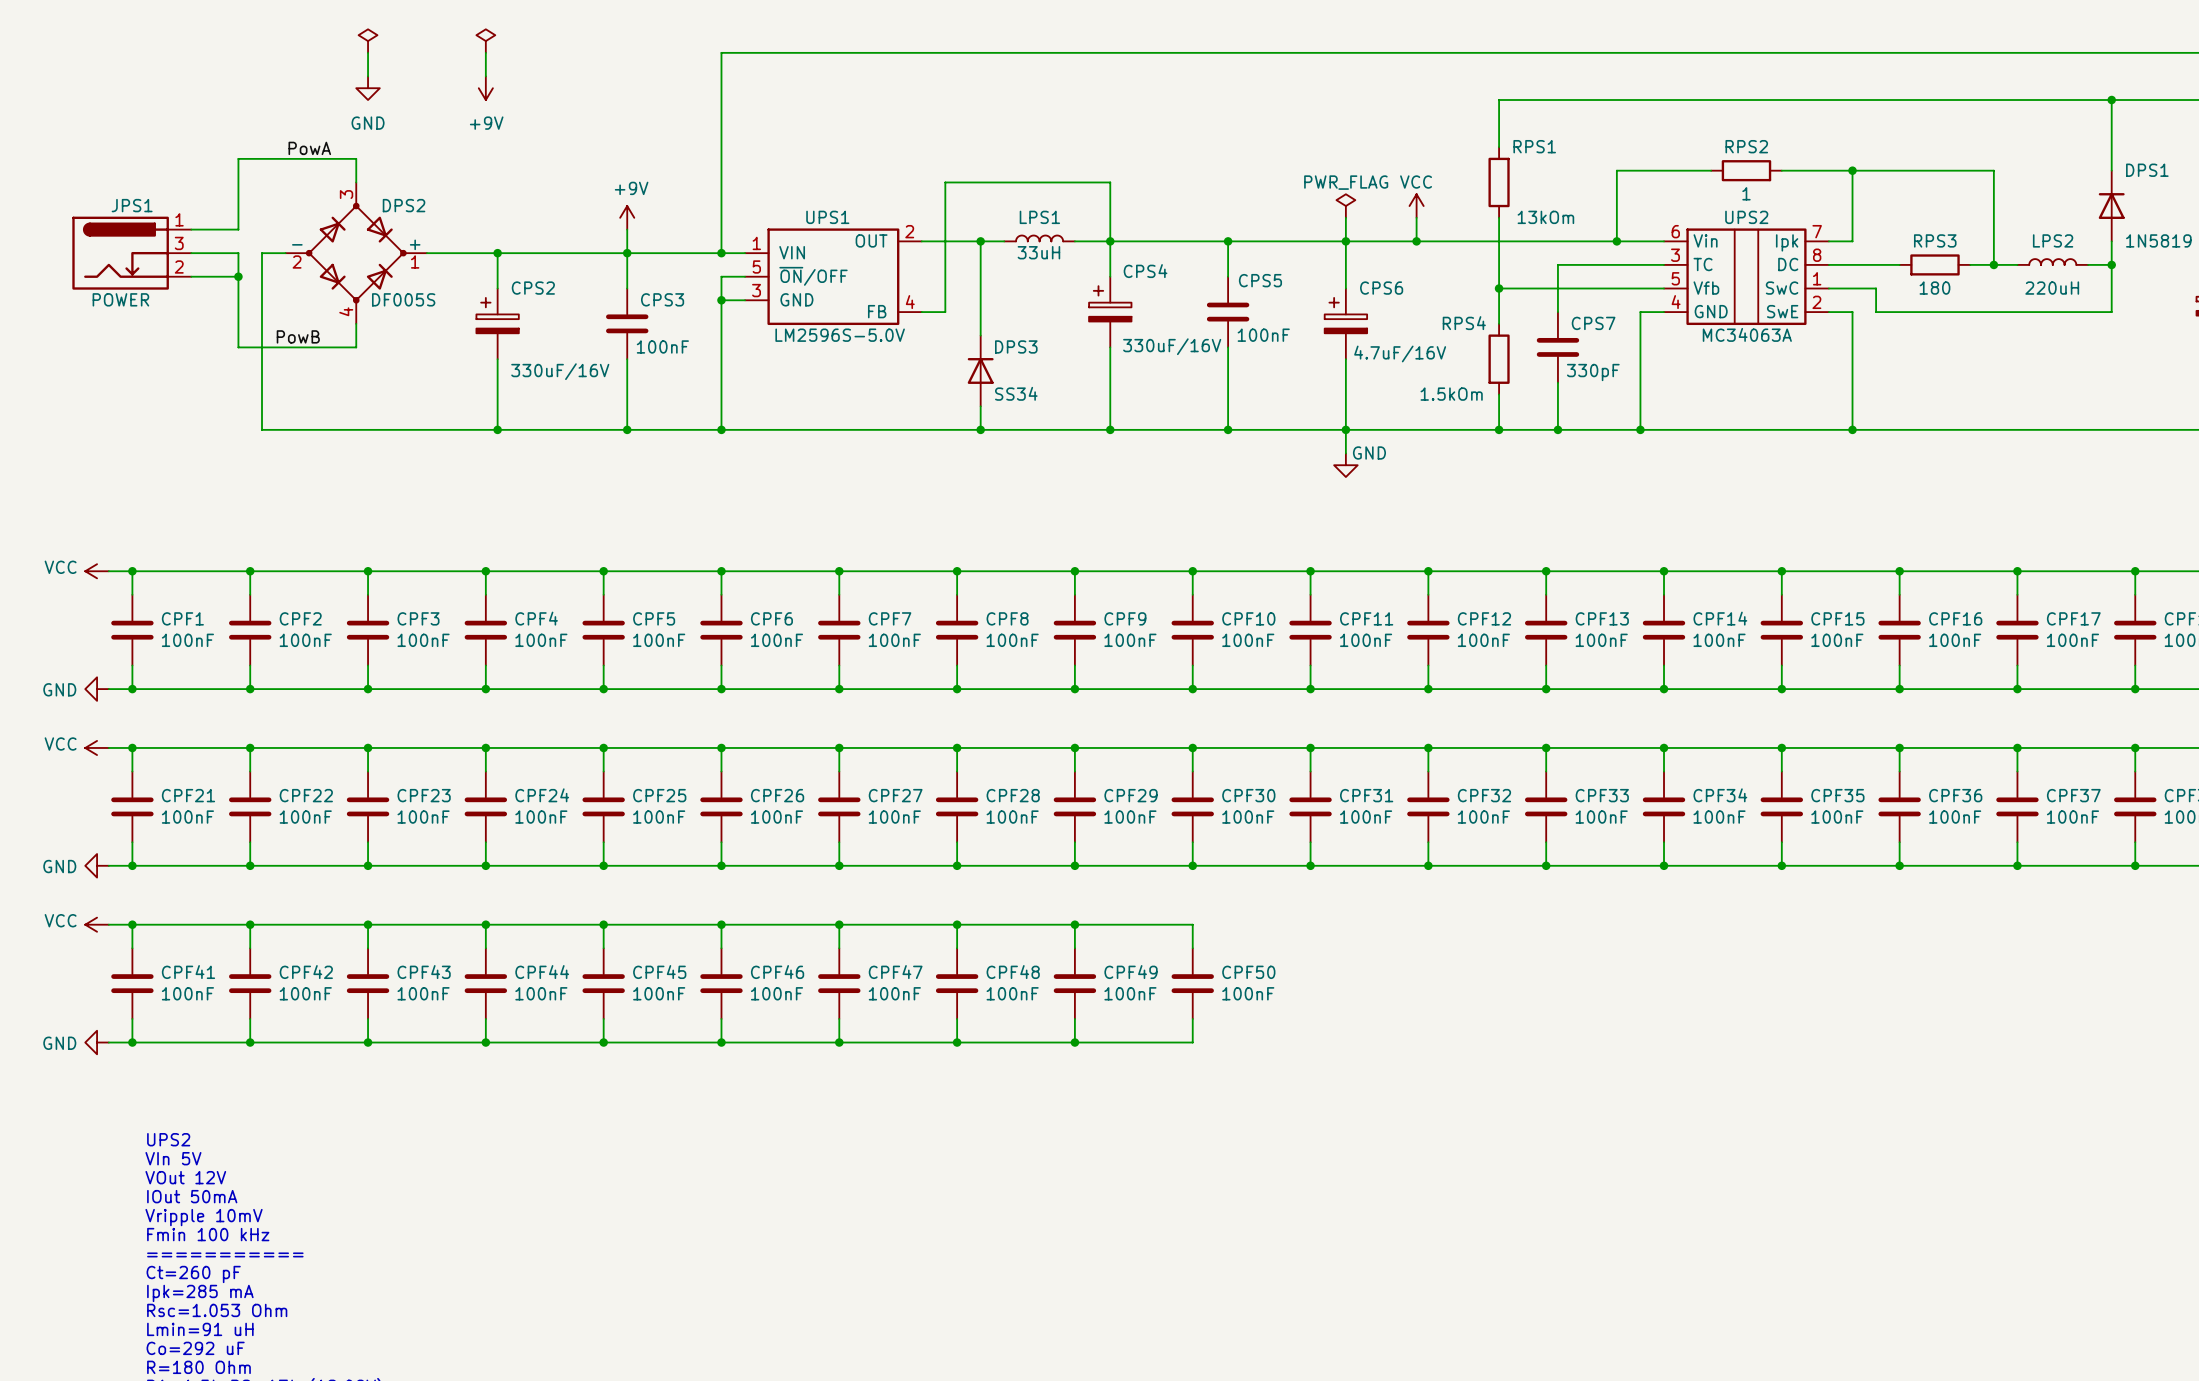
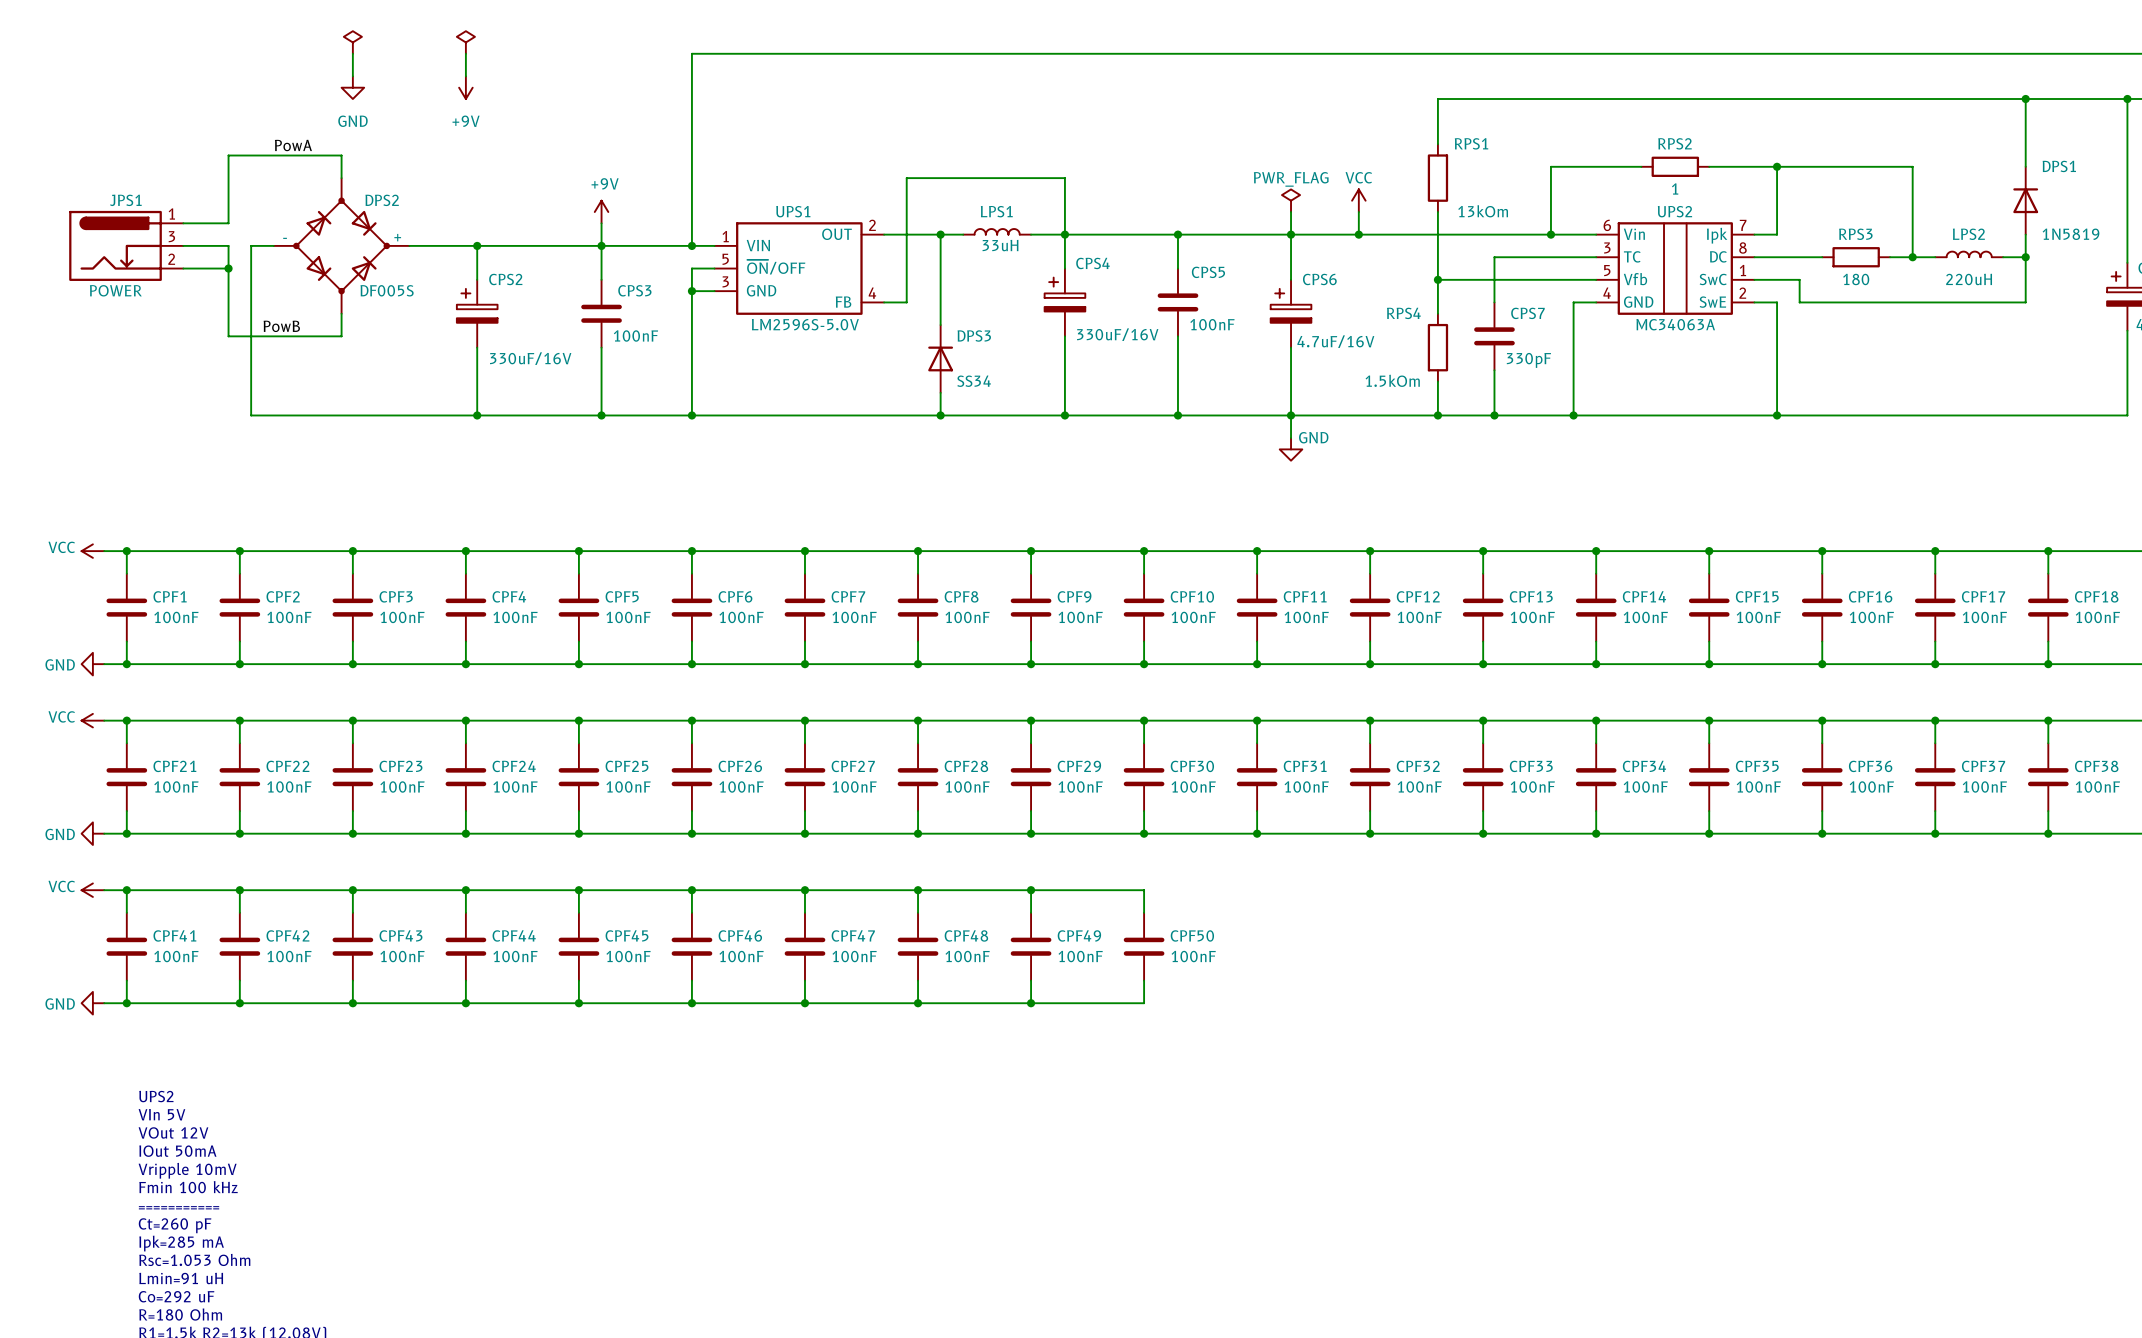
DPS2 pin number: 3 (346, 194) -> none
DPS2 pin number: 2 (297, 261) -> none
DPS2 pin number: 1 (415, 261) -> none
DPS2 pin number: 4 (346, 311) -> none

